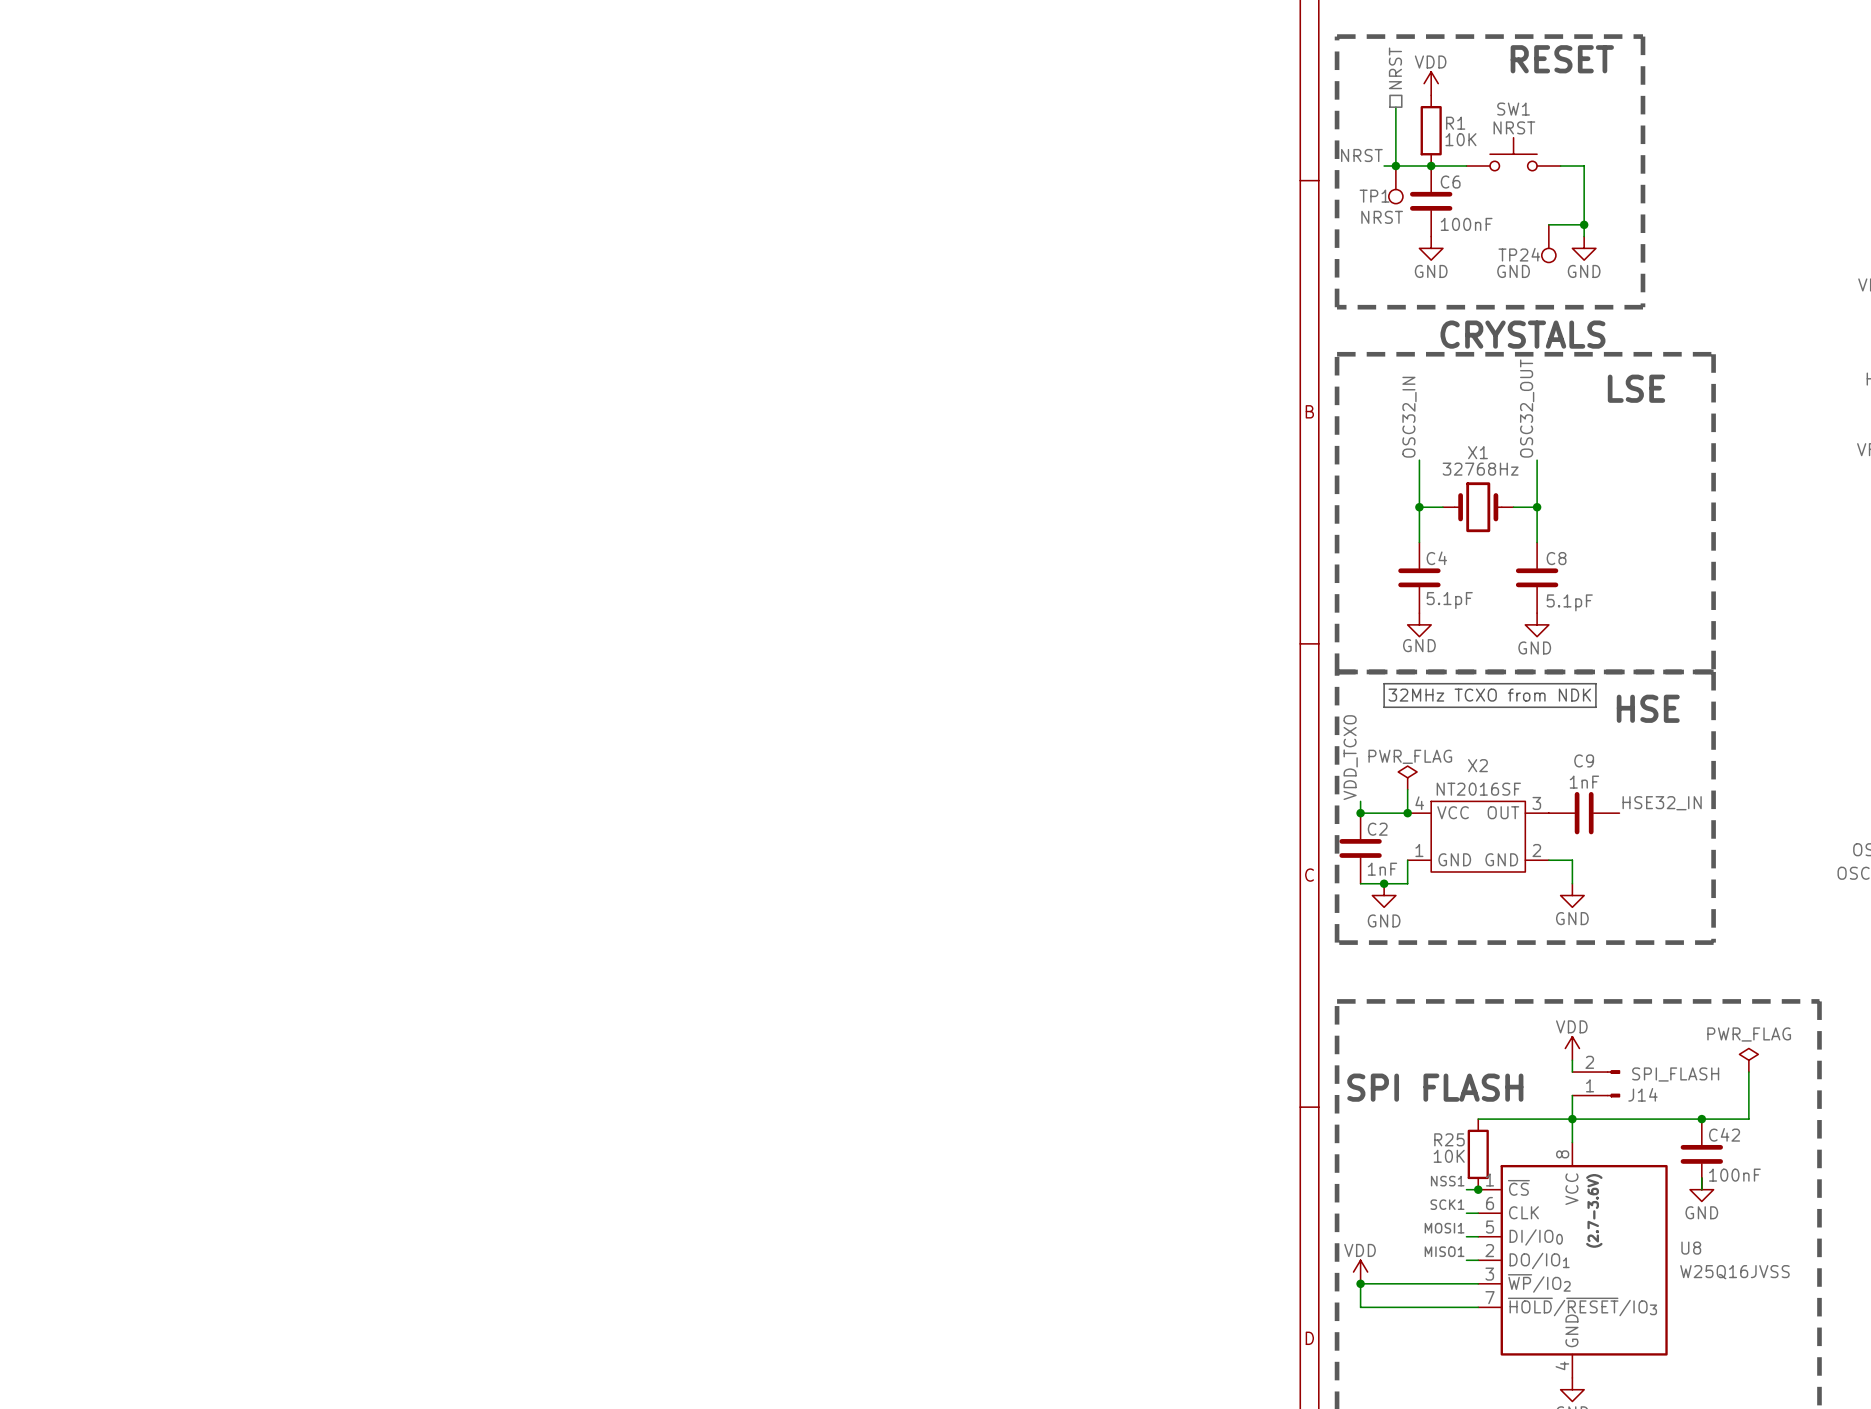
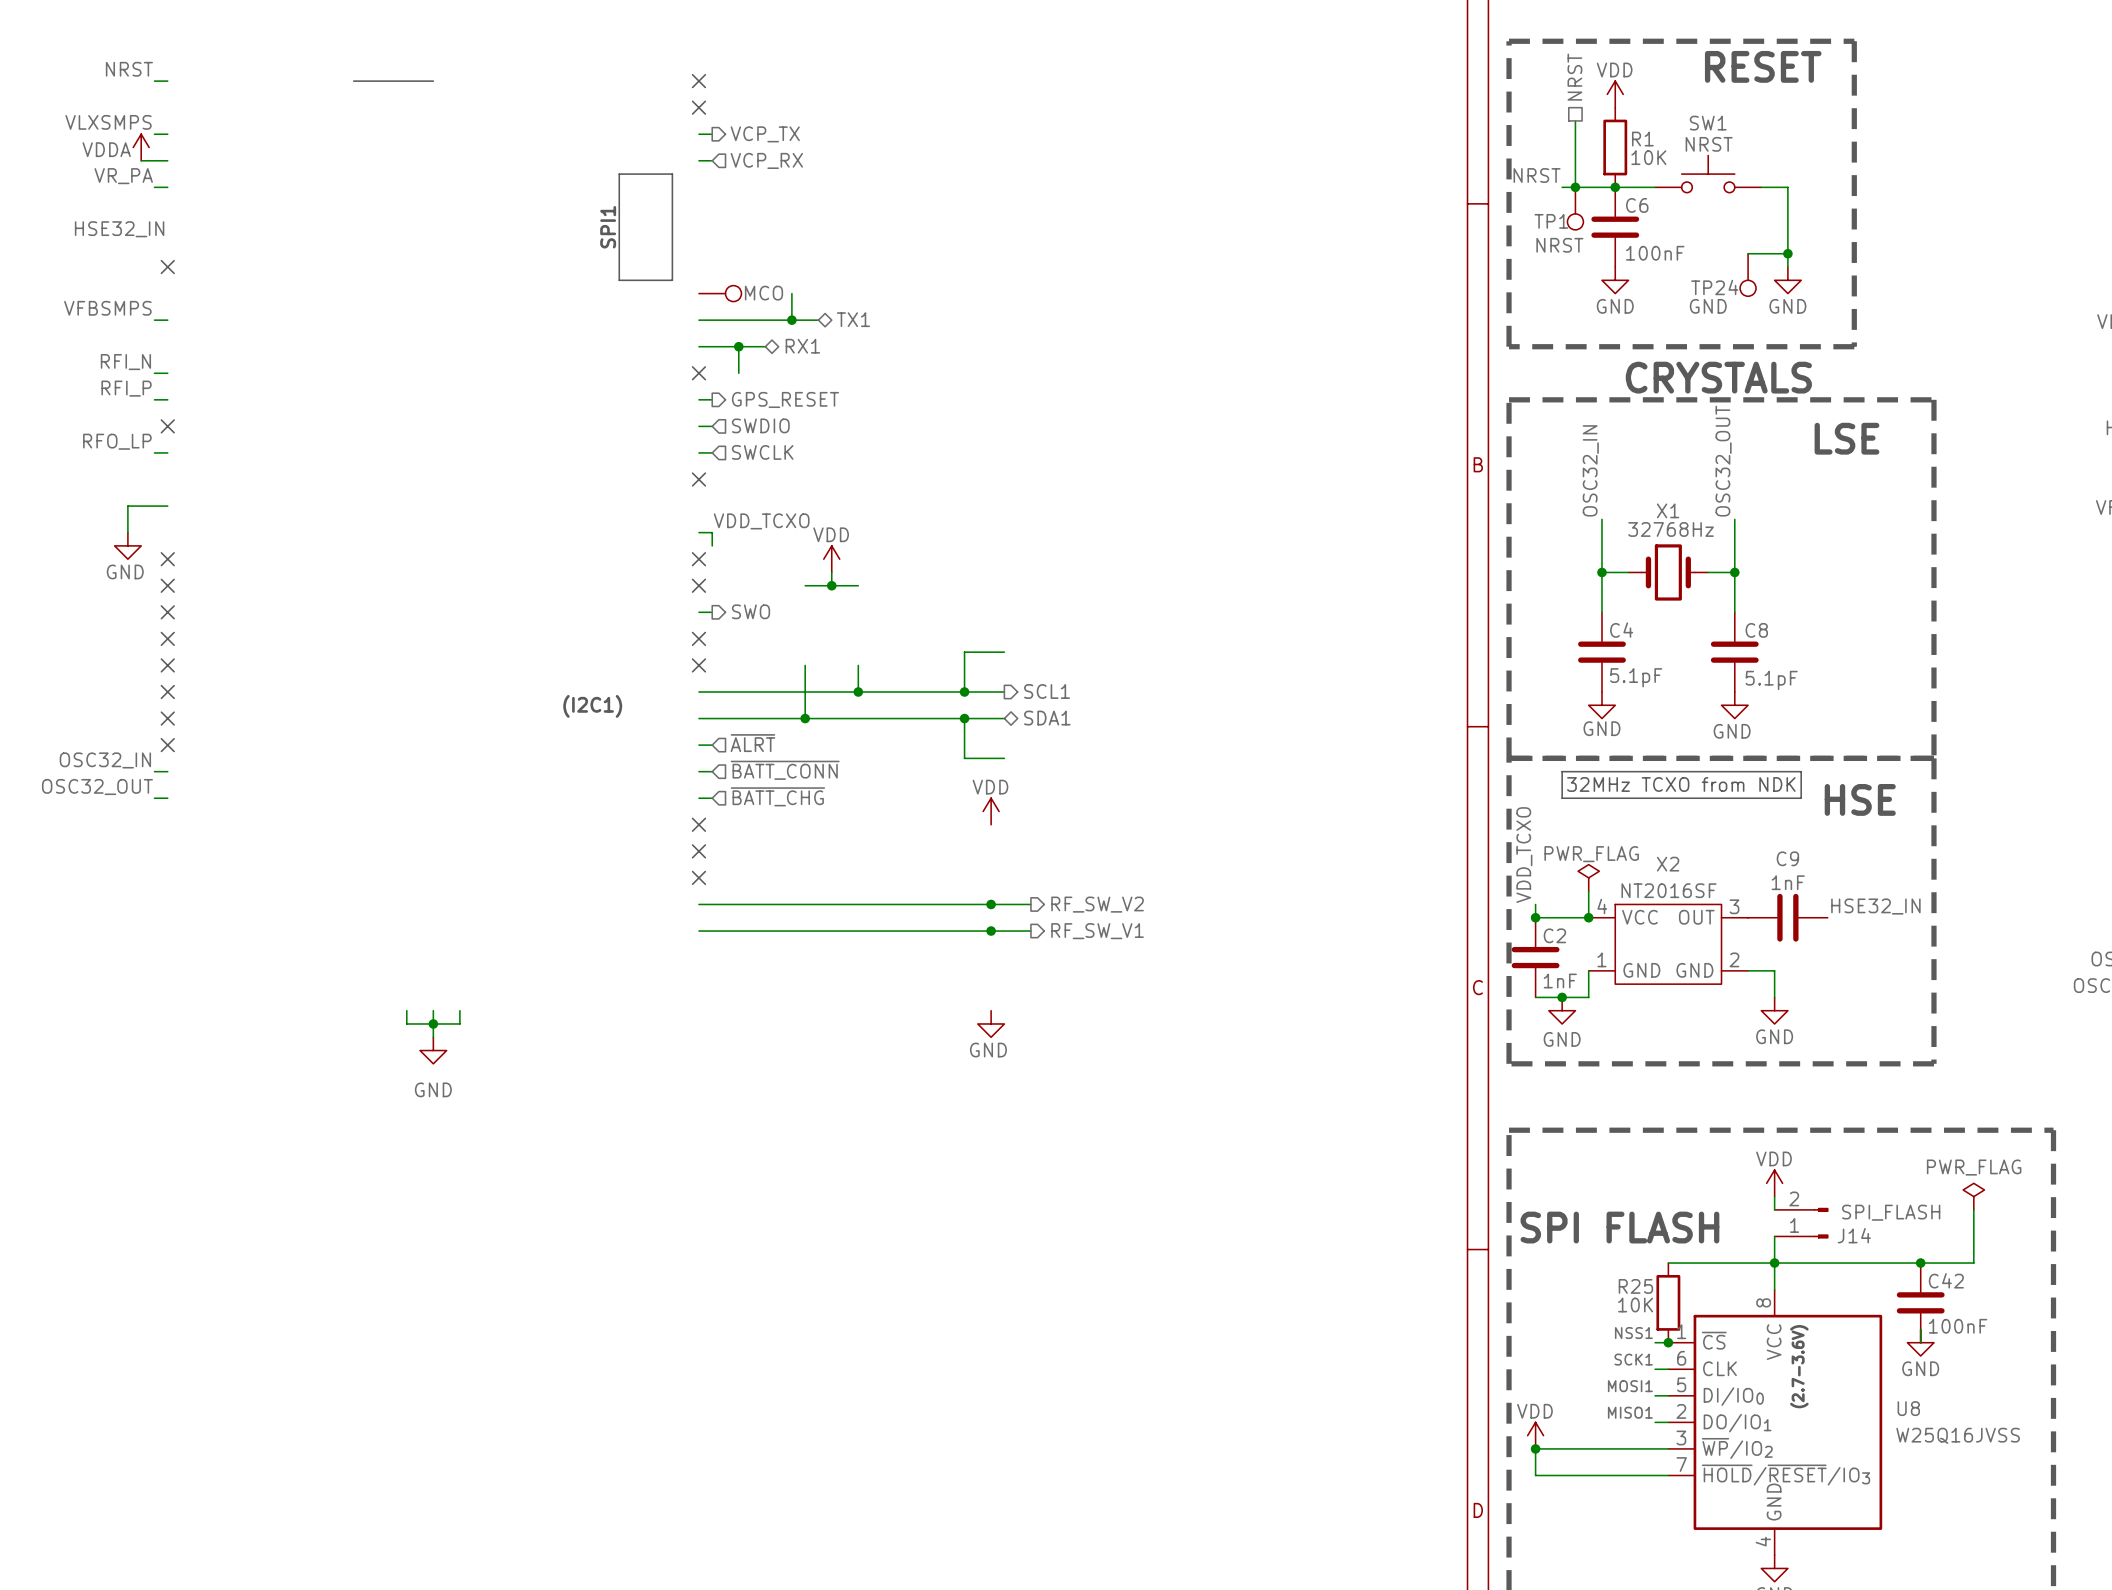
label: none -> NRST (129, 69)
wire: none -> (154, 81) (167, 81)
line: none -> (353, 81) (433, 81)
no-connect mark: none -> (698, 81)
no-connect mark: none -> (698, 107)
label: none -> VLXSMPS (108, 122)
wire: none -> (154, 134) (167, 134)
wire: none -> (698, 134) (712, 134)
hierarchical label: none -> VCP_TX (765, 134)
power symbol: none -> VDDA (141, 147)
wire: none -> (141, 160) (167, 160)
wire: none -> (698, 160) (712, 160)
hierarchical label: none -> VCP_RX (766, 160)
line: none -> (619, 174) (672, 174) (672, 280) (619, 280) (619, 174)
label: none -> VR_PA (123, 176)
wire: none -> (154, 187) (167, 187)
text: none -> SPI1 (608, 227)
label: none -> HSE32_IN (119, 229)
no-connect mark: none -> (167, 267)
part: none -> MCO (720, 293)
wire: none -> (791, 293) (791, 320)
label: none -> VFBSMPS (107, 308)
wire: none -> (154, 320) (167, 320)
wire: none -> (698, 320) (818, 320)
junction: none -> (791, 320)
hierarchical label: none -> TX1 (853, 319)
hierarchical label: none -> RX1 (802, 346)
wire: none -> (698, 346) (765, 346)
wire: none -> (738, 346) (738, 373)
junction: none -> (738, 346)
label: none -> RFI_N (125, 362)
wire: none -> (154, 373) (167, 373)
no-connect mark: none -> (698, 373)
label: none -> RFI_P (126, 388)
wire: none -> (154, 399) (167, 399)
wire: none -> (698, 399) (712, 399)
hierarchical label: none -> GPS_RESET (785, 399)
no-connect mark: none -> (167, 426)
wire: none -> (698, 426) (712, 426)
hierarchical label: none -> SWDIO (760, 425)
label: none -> RFO_LP (117, 441)
hierarchical label: none -> SWCLK (762, 452)
wire: none -> (154, 452) (167, 452)
wire: none -> (698, 452) (712, 452)
no-connect mark: none -> (698, 479)
wire: none -> (167, 506) (127, 506) (127, 532)
label: none -> VDD_TCXO (761, 521)
wire: none -> (698, 532) (712, 532) (712, 545)
power symbol: none -> GND (127, 545)
no-connect mark: none -> (167, 559)
no-connect mark: none -> (698, 559)
power symbol: none -> VDD (831, 559)
wire: none -> (831, 572) (831, 585)
no-connect mark: none -> (167, 585)
no-connect mark: none -> (698, 585)
wire: none -> (805, 585) (858, 585)
junction: none -> (831, 585)
no-connect mark: none -> (167, 612)
wire: none -> (698, 612) (712, 612)
hierarchical label: none -> SWO (751, 611)
no-connect mark: none -> (167, 638)
no-connect mark: none -> (698, 638)
wire: none -> (1004, 652) (964, 652) (964, 691)
no-connect mark: none -> (167, 665)
no-connect mark: none -> (698, 665)
wire: none -> (805, 665) (805, 718)
wire: none -> (858, 665) (858, 691)
hierarchical label: none -> SCL1 (1047, 691)
no-connect mark: none -> (167, 691)
wire: none -> (698, 691) (1004, 691)
junction: none -> (858, 691)
junction: none -> (964, 691)
text: none -> (I2C1) (592, 706)
no-connect mark: none -> (167, 718)
wire: none -> (698, 718) (1004, 718)
junction: none -> (805, 718)
wire: none -> (964, 718) (964, 758) (1004, 758)
junction: none -> (964, 718)
hierarchical label: none -> SDA1 (1047, 718)
hierarchical label: none -> ~{ALRT} (752, 743)
no-connect mark: none -> (167, 745)
wire: none -> (698, 745) (712, 745)
label: none -> OSC32_IN (105, 760)
hierarchical label: none -> ~{BATT_CONN} (785, 770)
wire: none -> (154, 771) (167, 771)
wire: none -> (698, 771) (712, 771)
label: none -> OSC32_OUT (97, 787)
hierarchical label: none -> ~{BATT_CHG} (777, 796)
wire: none -> (154, 798) (167, 798)
wire: none -> (698, 798) (712, 798)
power symbol: none -> VDD (991, 811)
no-connect mark: none -> (698, 824)
no-connect mark: none -> (698, 851)
no-connect mark: none -> (698, 877)
wire: none -> (698, 904) (1030, 904)
junction: none -> (991, 904)
hierarchical label: none -> RF_SW_V2 (1097, 904)
wire: none -> (698, 931) (1030, 931)
junction: none -> (991, 931)
hierarchical label: none -> RF_SW_V1 (1097, 931)
wire: none -> (406, 1010) (406, 1023) (459, 1023) (459, 1010)
wire: none -> (433, 1010) (433, 1037)
junction: none -> (433, 1023)
power symbol: none -> GND (991, 1023)
power symbol: none -> GND (433, 1050)

